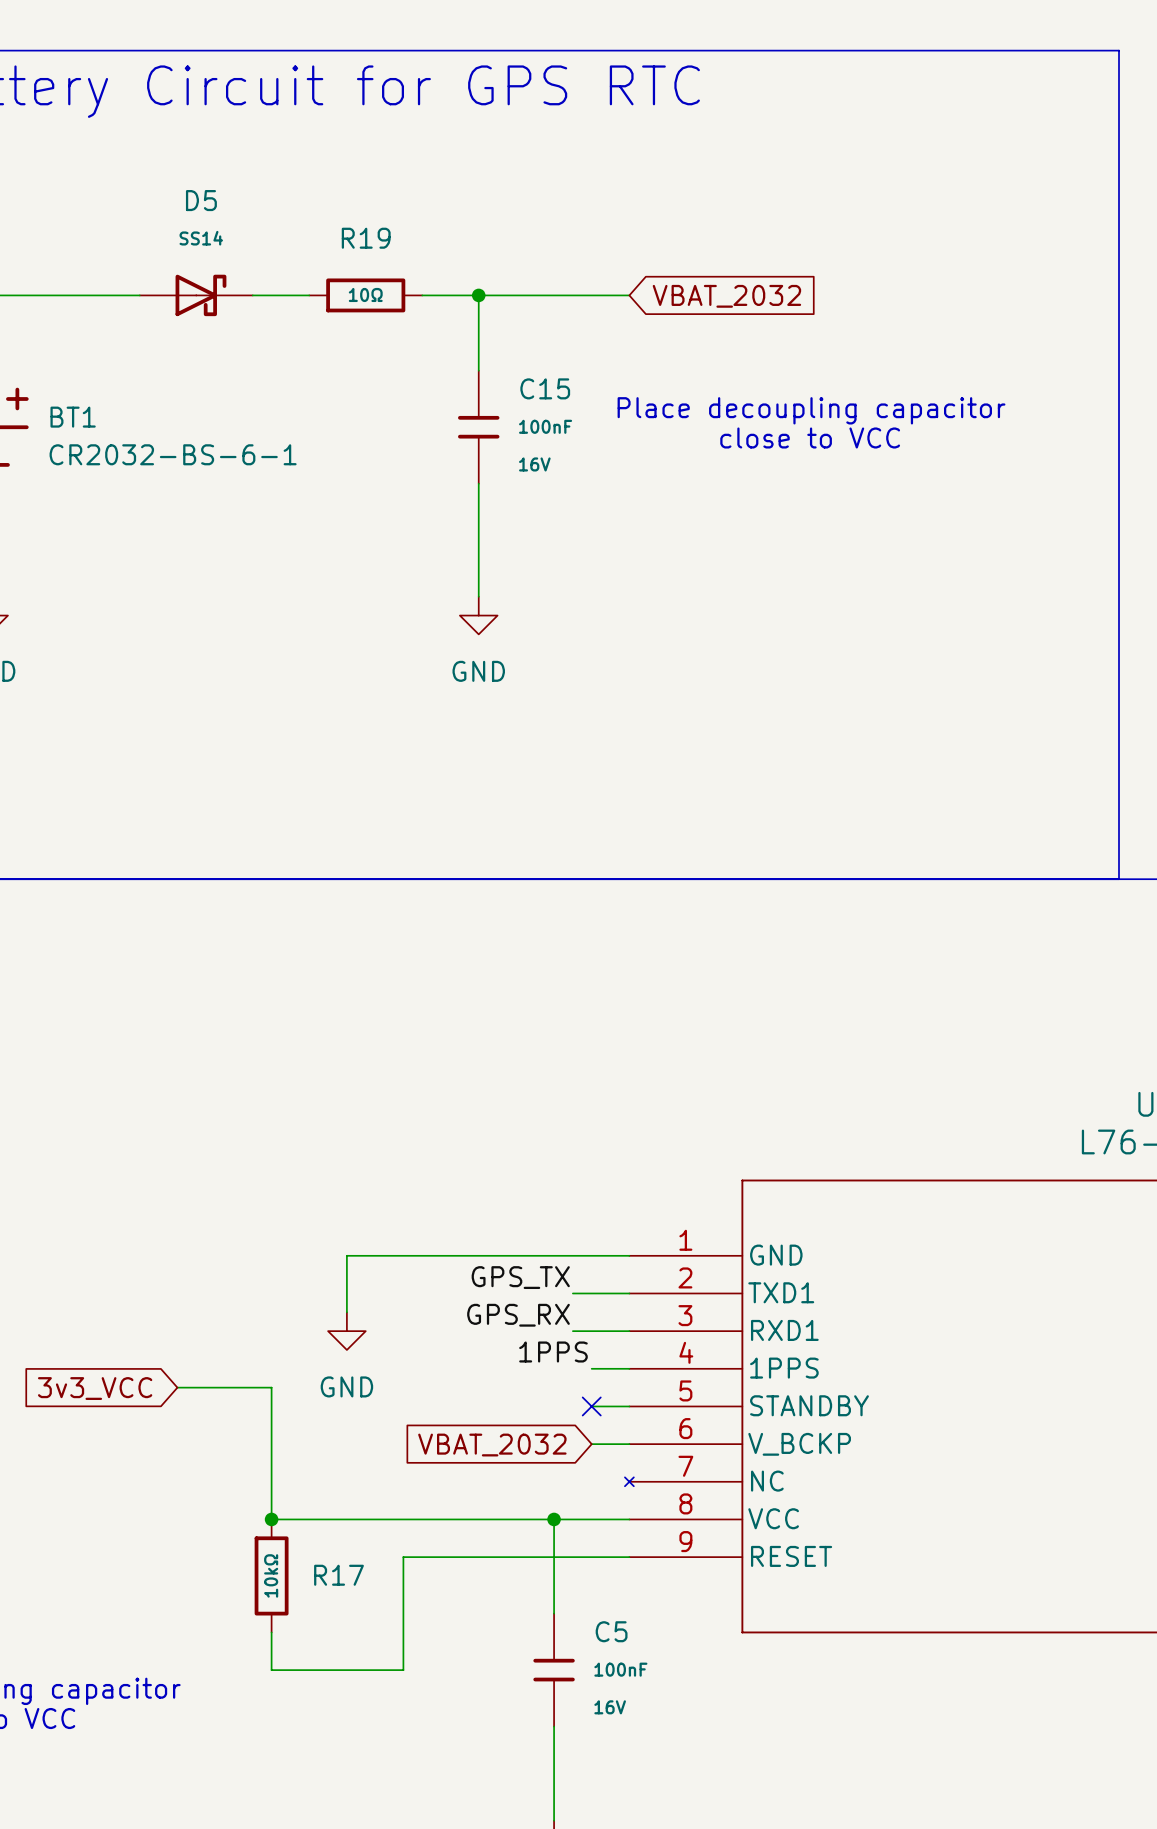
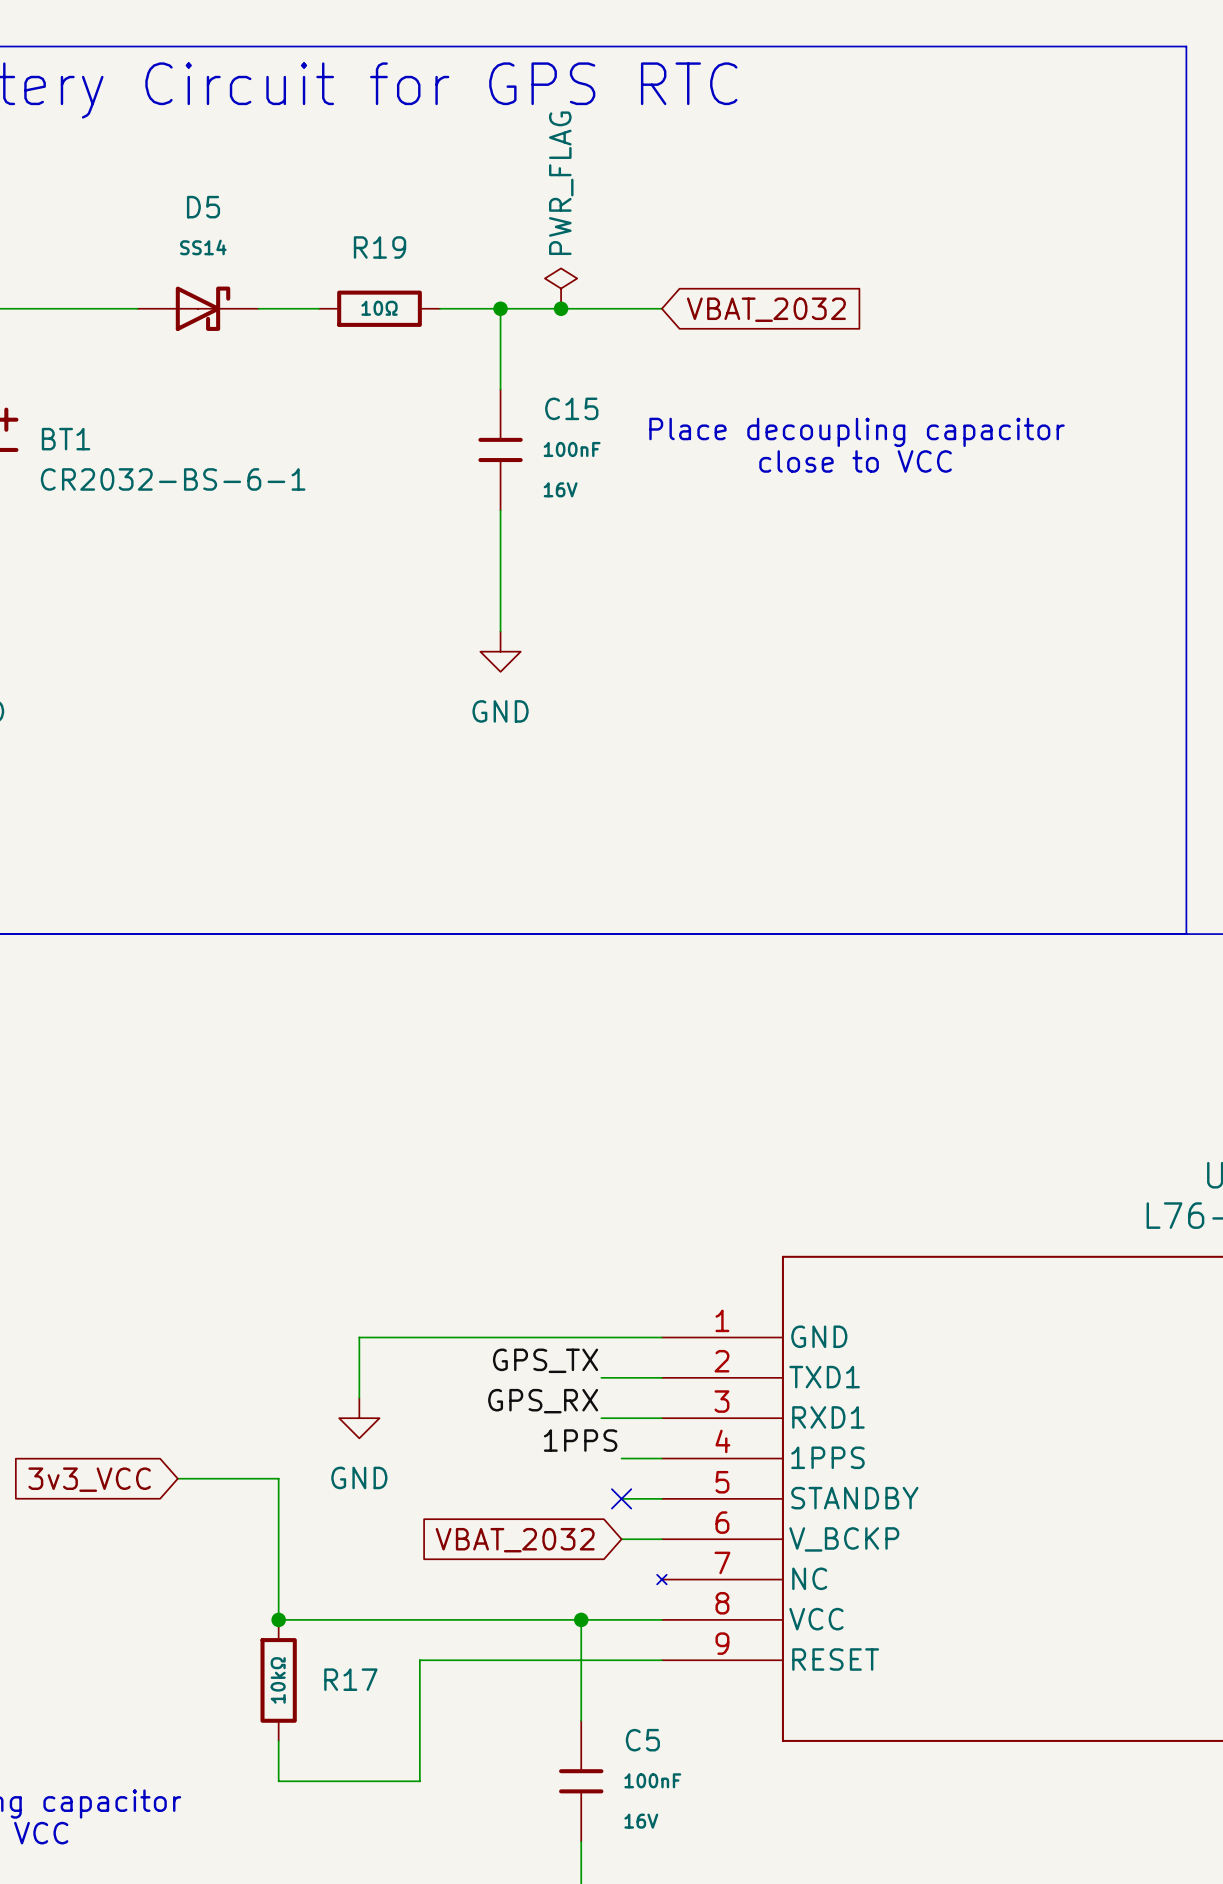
power symbol: none -> PWR_FLAG (561, 288)
junction: none -> (561, 308)

